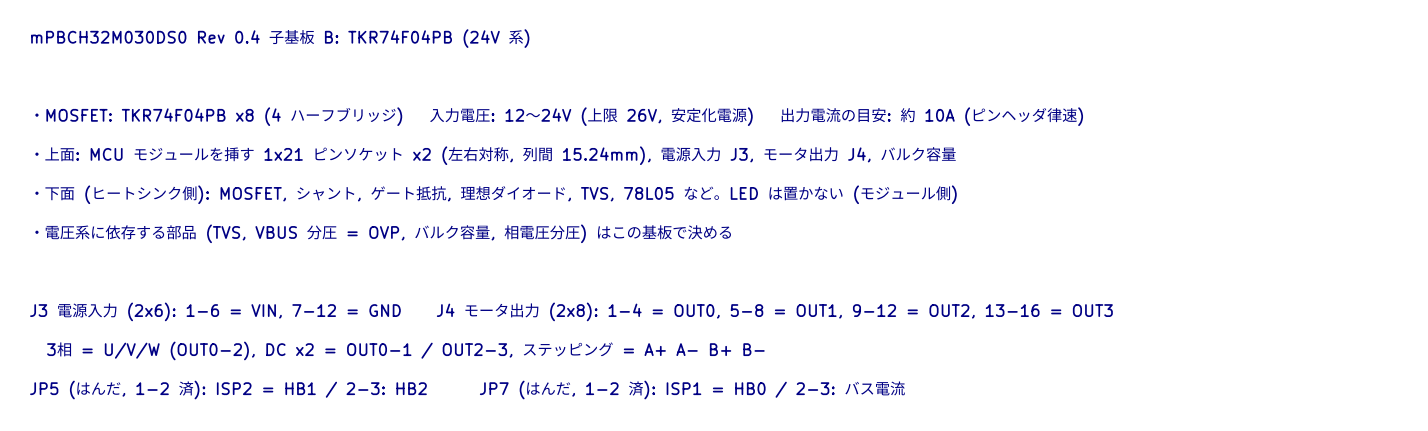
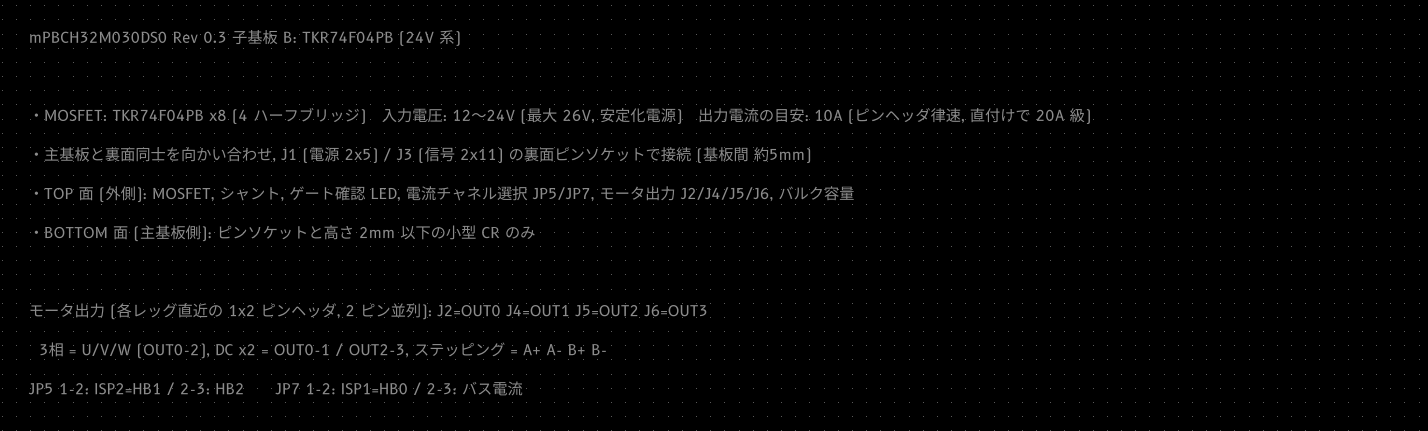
text: mPBCH32M030DS0 Rev 0.4 子基板 B: TKR74F04PB (24V 系) (280, 38) -> mPBCH32M030DS0 Rev 0.3 子基板 B: TKR74F04PB (24V 系) (244, 37)
text: ・MOSFET: TKR74F04PB x8 (4 ハーフブリッジ) 入力電圧: 12〜24V (上限 26V, 安定化電源) 出力電流の目安: 約 10A (ピンヘッダ律速) (558, 116) -> ・MOSFET: TKR74F04PB x8 (4 ハーフブリッジ) 入力電圧: 12〜24V (最大 26V, 安定化電源) 出力電流の目安: 10A (ピンヘッダ律速, 直付けで 20A 級) (562, 115)
text: ・上面: MCU モジュールを挿す 1x21 ピンソケット x2 (左右対称, 列間 15.24mm), 電源入力 J3, モータ出力 J4, バルク容量 (495, 155) -> ・主基板と裏面同士を向かい合わせ, J1 (電源 2x5) / J3 (信号 2x11) の裏面ピンソケットで接続 (基板間 約5mm) (422, 155)
text: ・下面 (ヒートシンク側): MOSFET, シャント, ゲート抵抗, 理想ダイオード, TVS, 78L05 など。LED は置かない (モジュール側) (495, 194) -> ・TOP 面 (外側): MOSFET, シャント, ゲート確認 LED, 電流チャネル選択 JP5/JP7, モータ出力 J2/J4/J5/J6, バルク容量 (444, 194)
text: ・電圧系に依存する部品 (TVS, VBUS 分圧 = OVP, バルク容量, 相電圧分圧) はこの基板で決める (383, 233) -> ・BOTTOM 面 (主基板側): ピンソケットと高さ 2mm 以下の小型 CR のみ (284, 233)
text: J3 電源入力 (2x6): 1-6 = VIN, 7-12 = GND J4 モータ出力 (2x8): 1-4 = OUT0, 5-8 = OUT1, 9-12 = OUT2, 13-16 = OUT3 (571, 311) -> モータ出力 (各レッグ直近の 1x2 ピンヘッダ, 2 ピン並列): J2=OUT0 J4=OUT1 J5=OUT2 J6=OUT3 (368, 311)
text: JP5 (はんだ, 1-2 済): ISP2 = HB1 / 2-3: HB2 JP7 (はんだ, 1-2 済): ISP1 = HB0 / 2-3: バス電流 (467, 389) -> JP5 1-2: ISP2=HB1 / 2-3: HB2 JP7 1-2: ISP1=HB0 / 2-3: バス電流 (275, 388)

